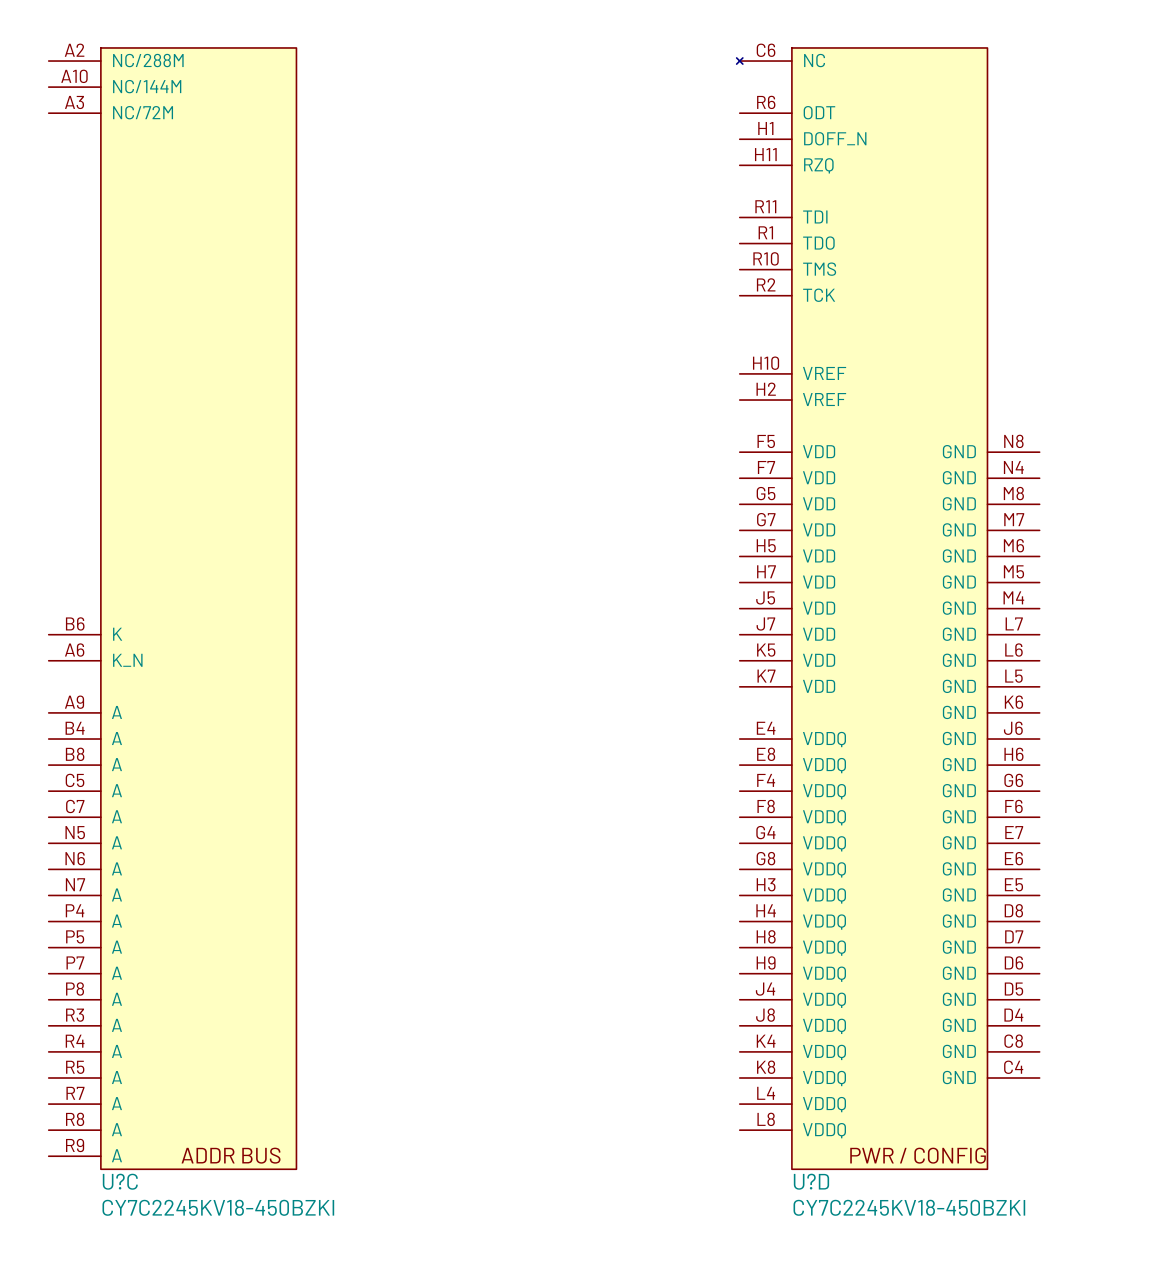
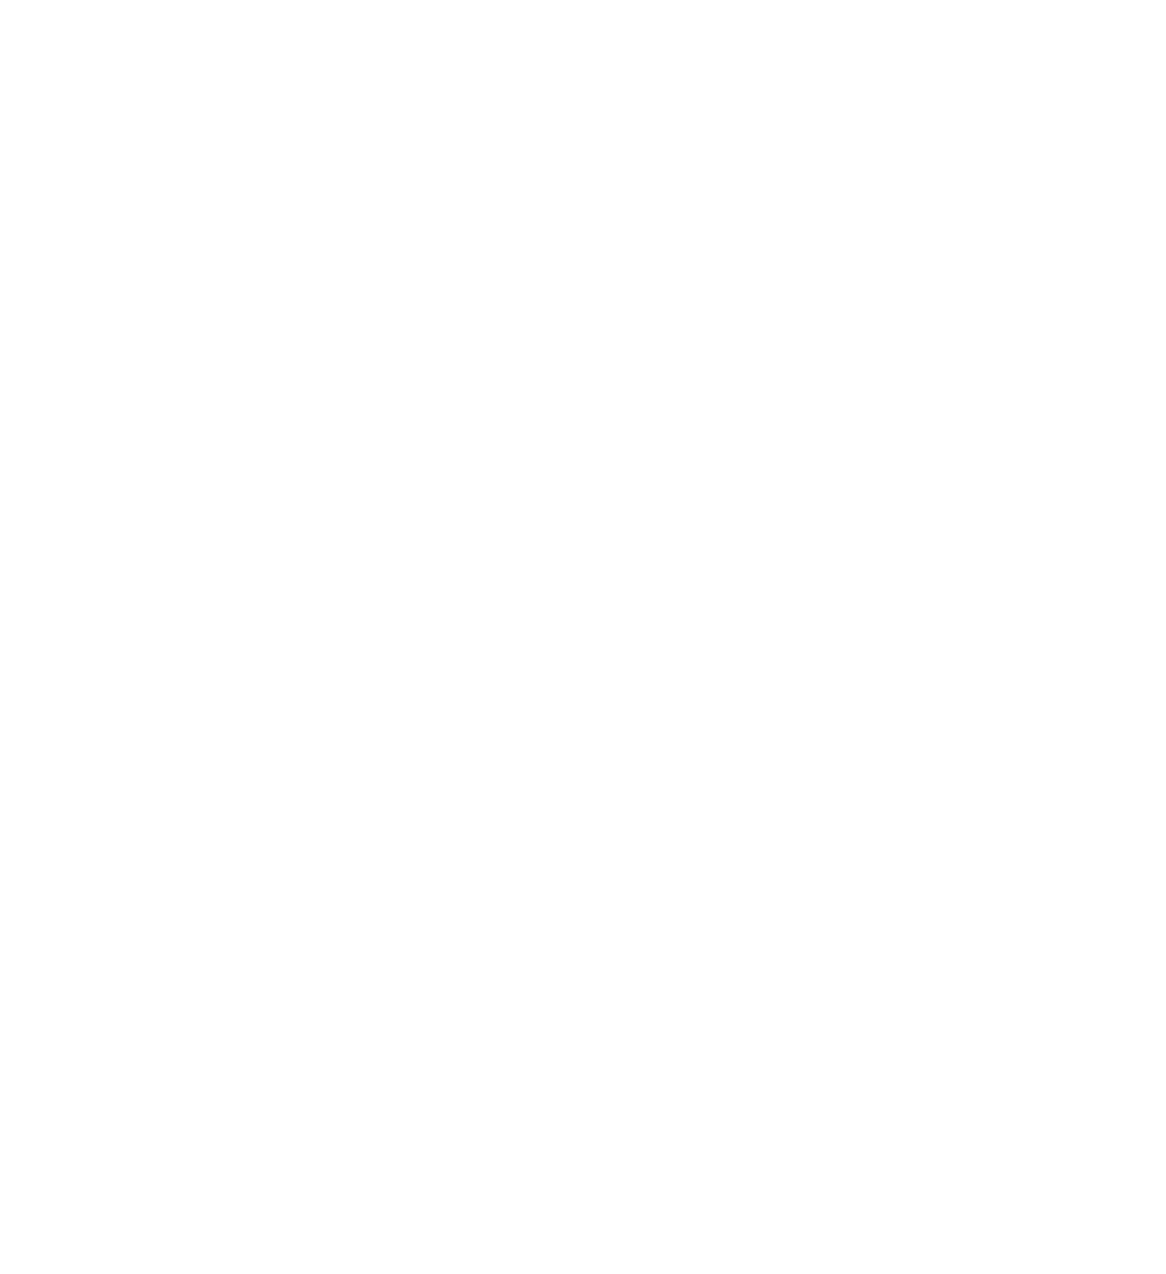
U?C: CY7C2245KV18-450BZKI (172, 608) -> none
U?D: CY7C2245KV18-450BZKI (888, 608) -> none

